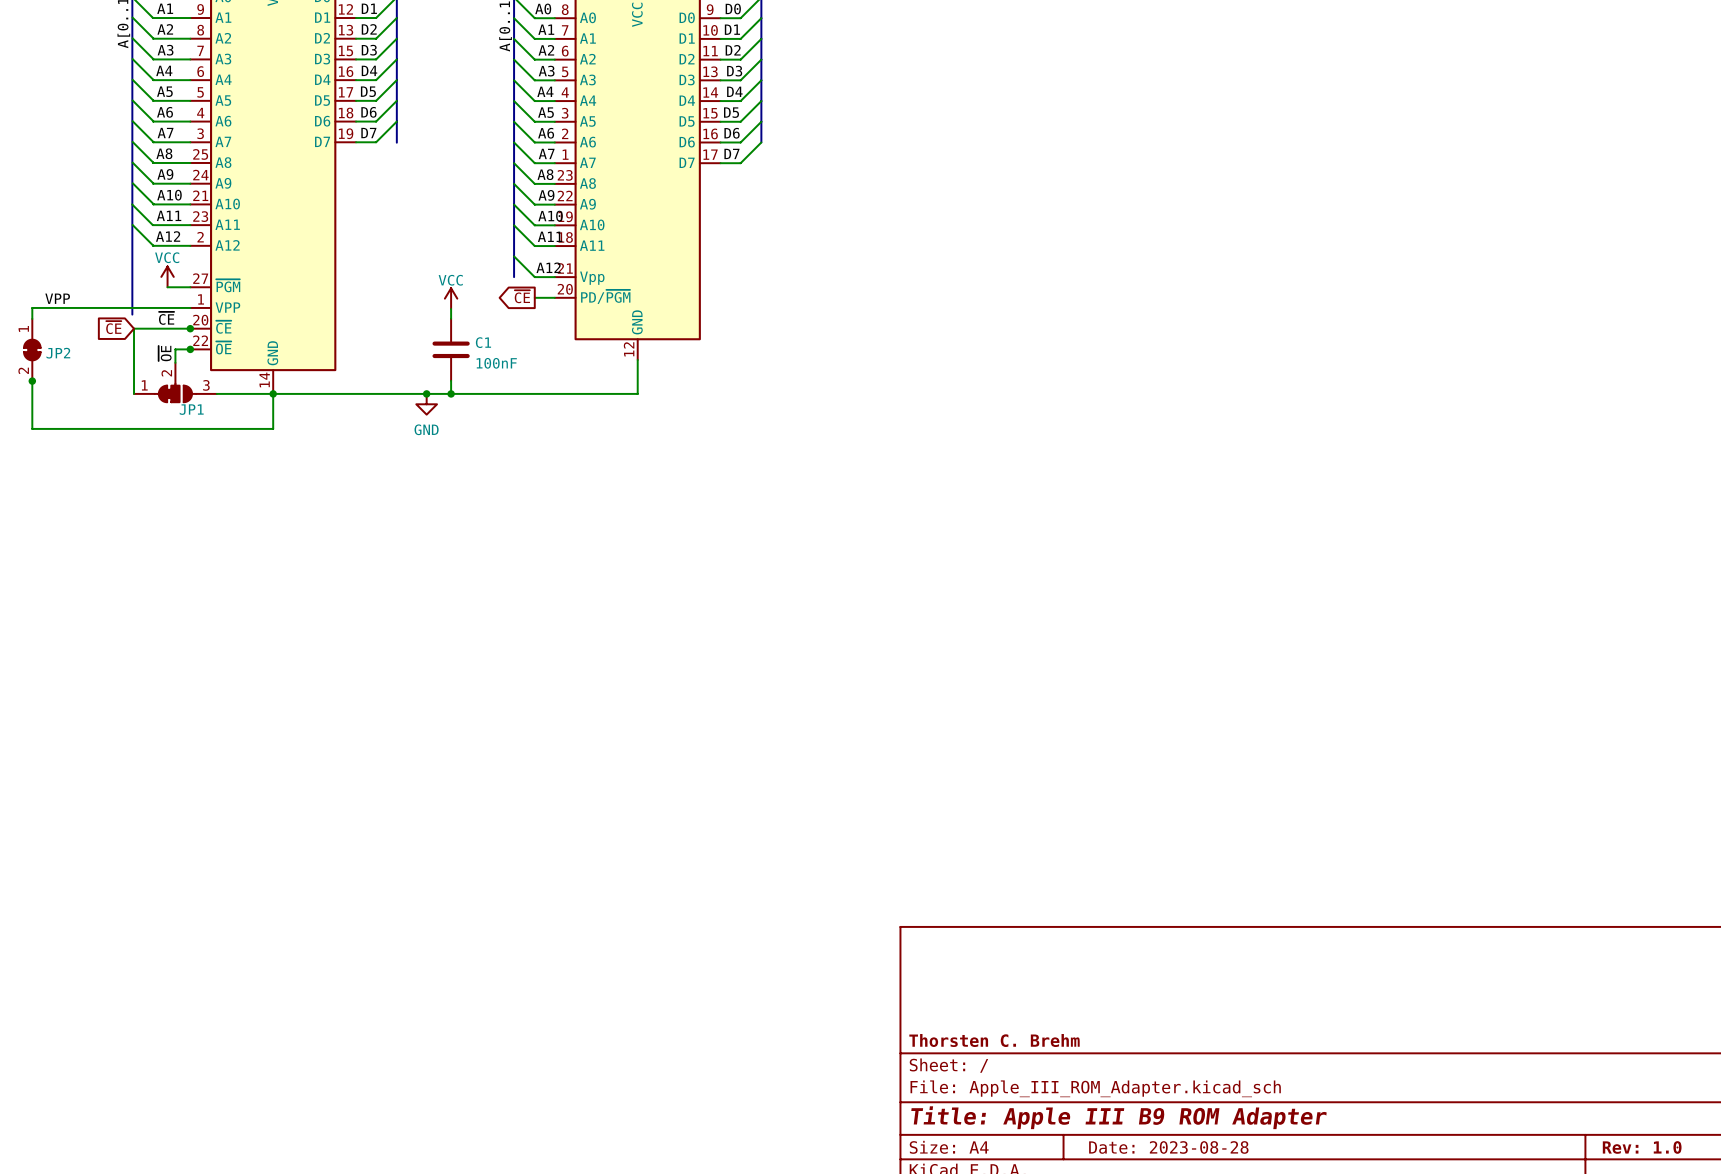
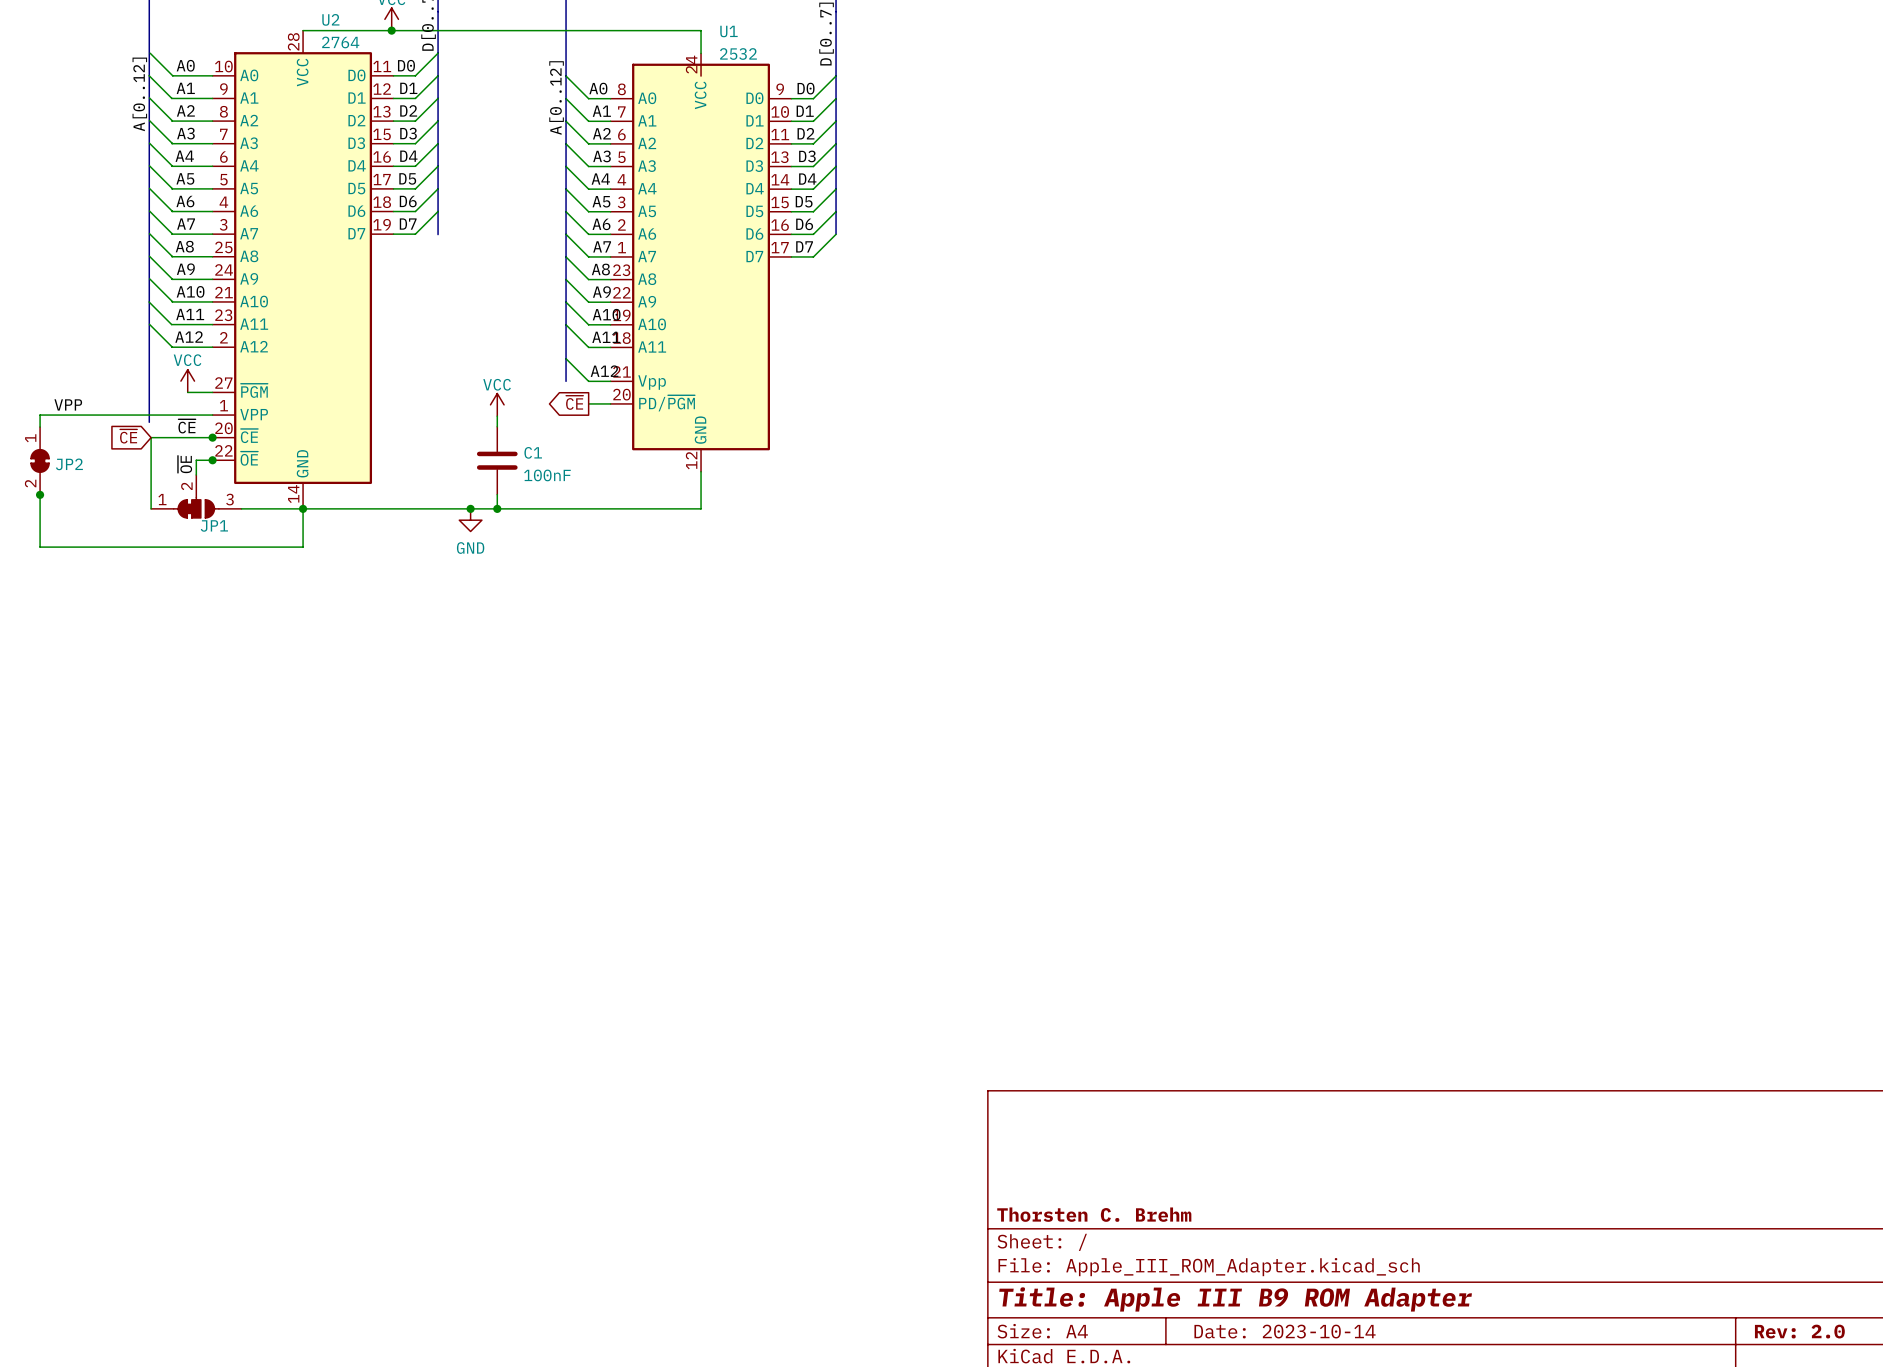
title block: Date: 2023-08-28 (1168, 1147) -> Date: 2023-10-14 (1285, 1331)
title block: Rev: 1.0 (1642, 1147) -> Rev: 2.0 (1799, 1331)

